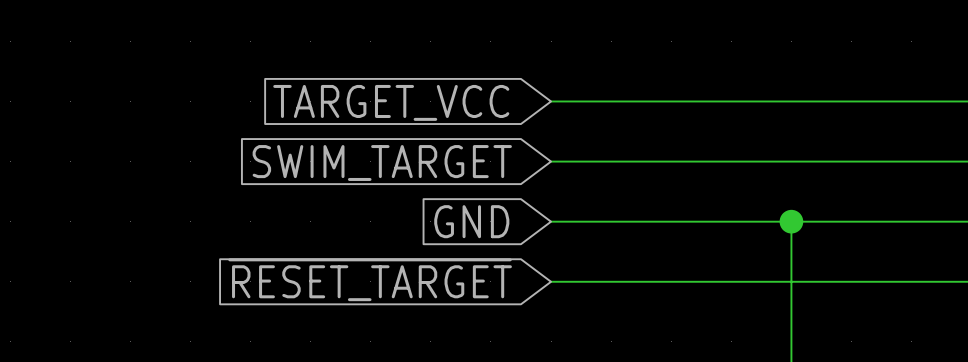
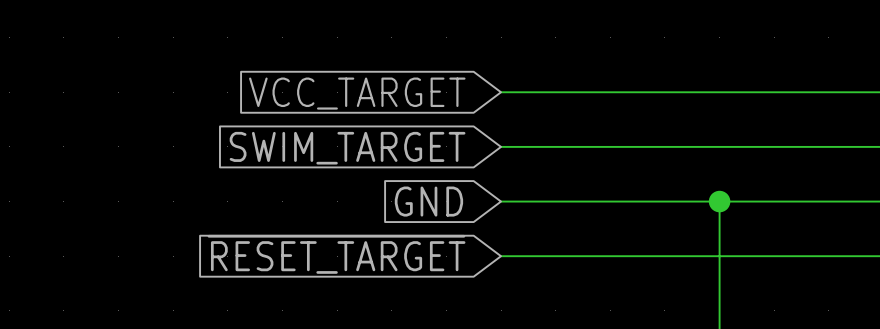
global label: TARGET_VCC (391, 102) -> VCC_TARGET (357, 93)

